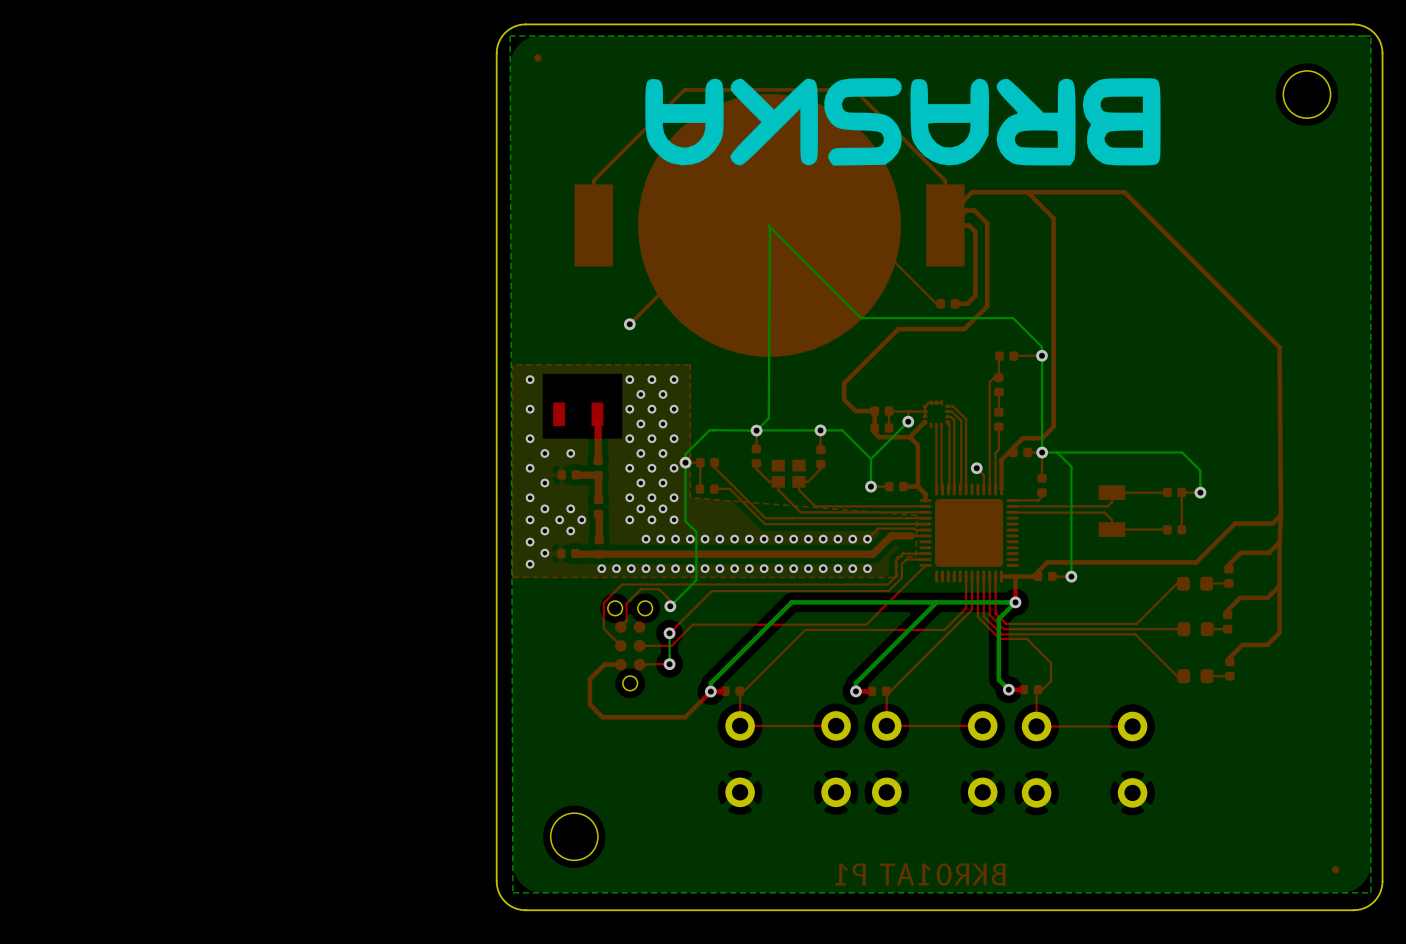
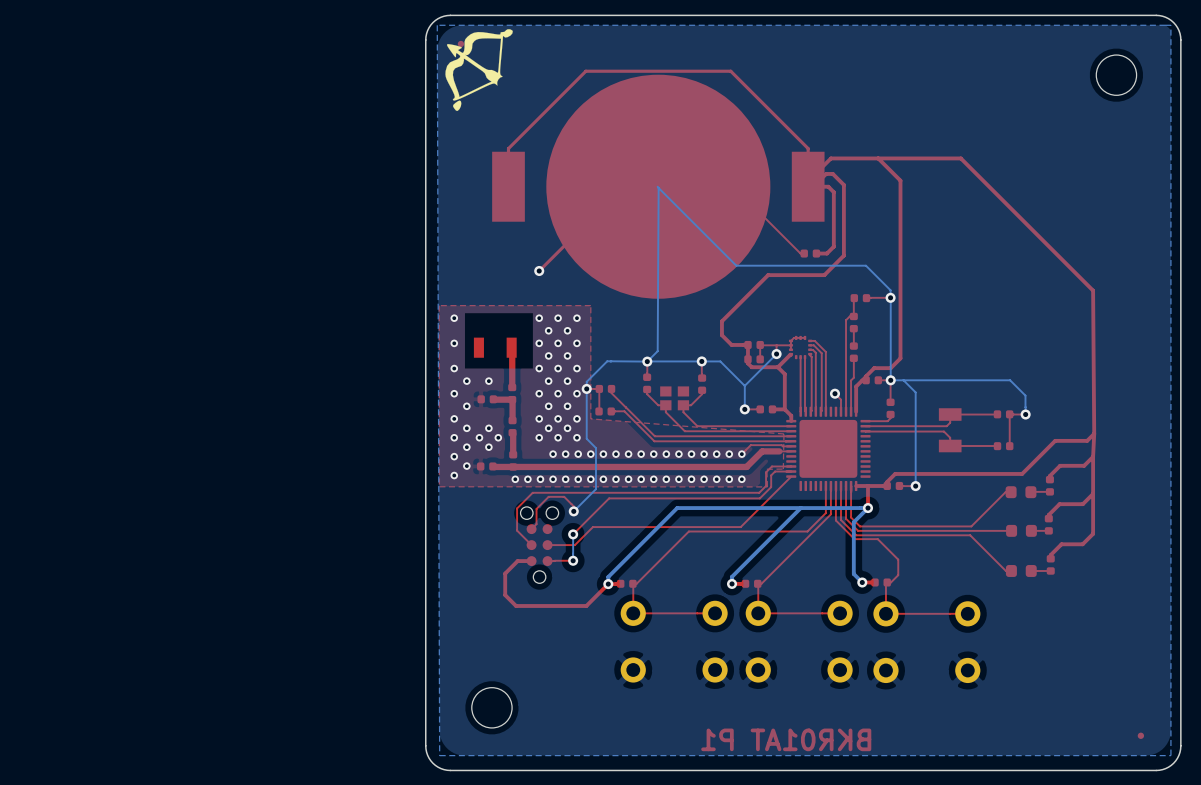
drawing: none -> [445, 29, 513, 111]
drawing: [645, 78, 1161, 166] -> none

